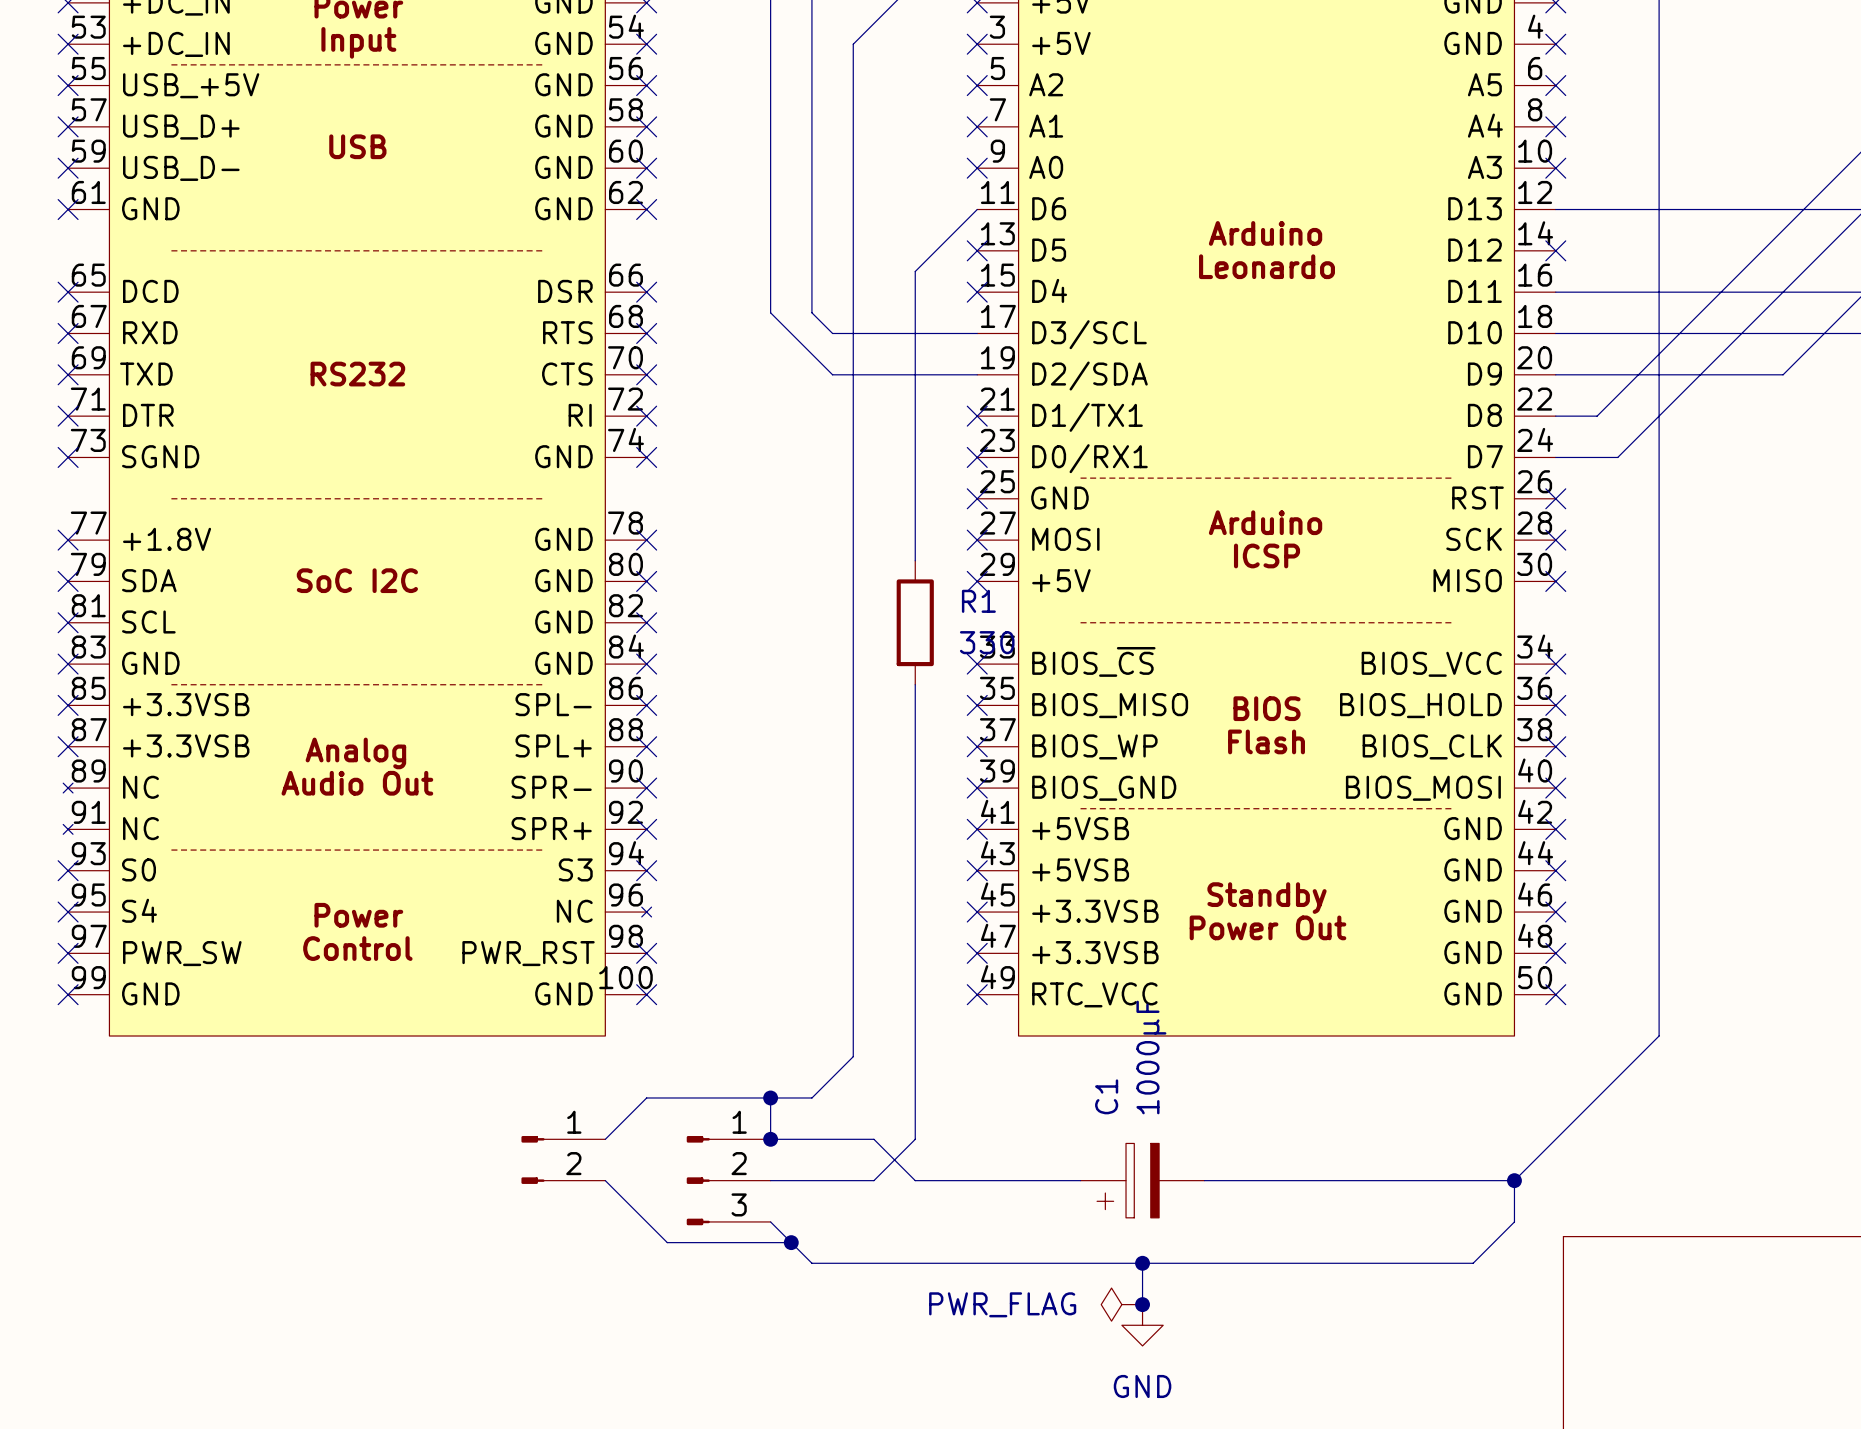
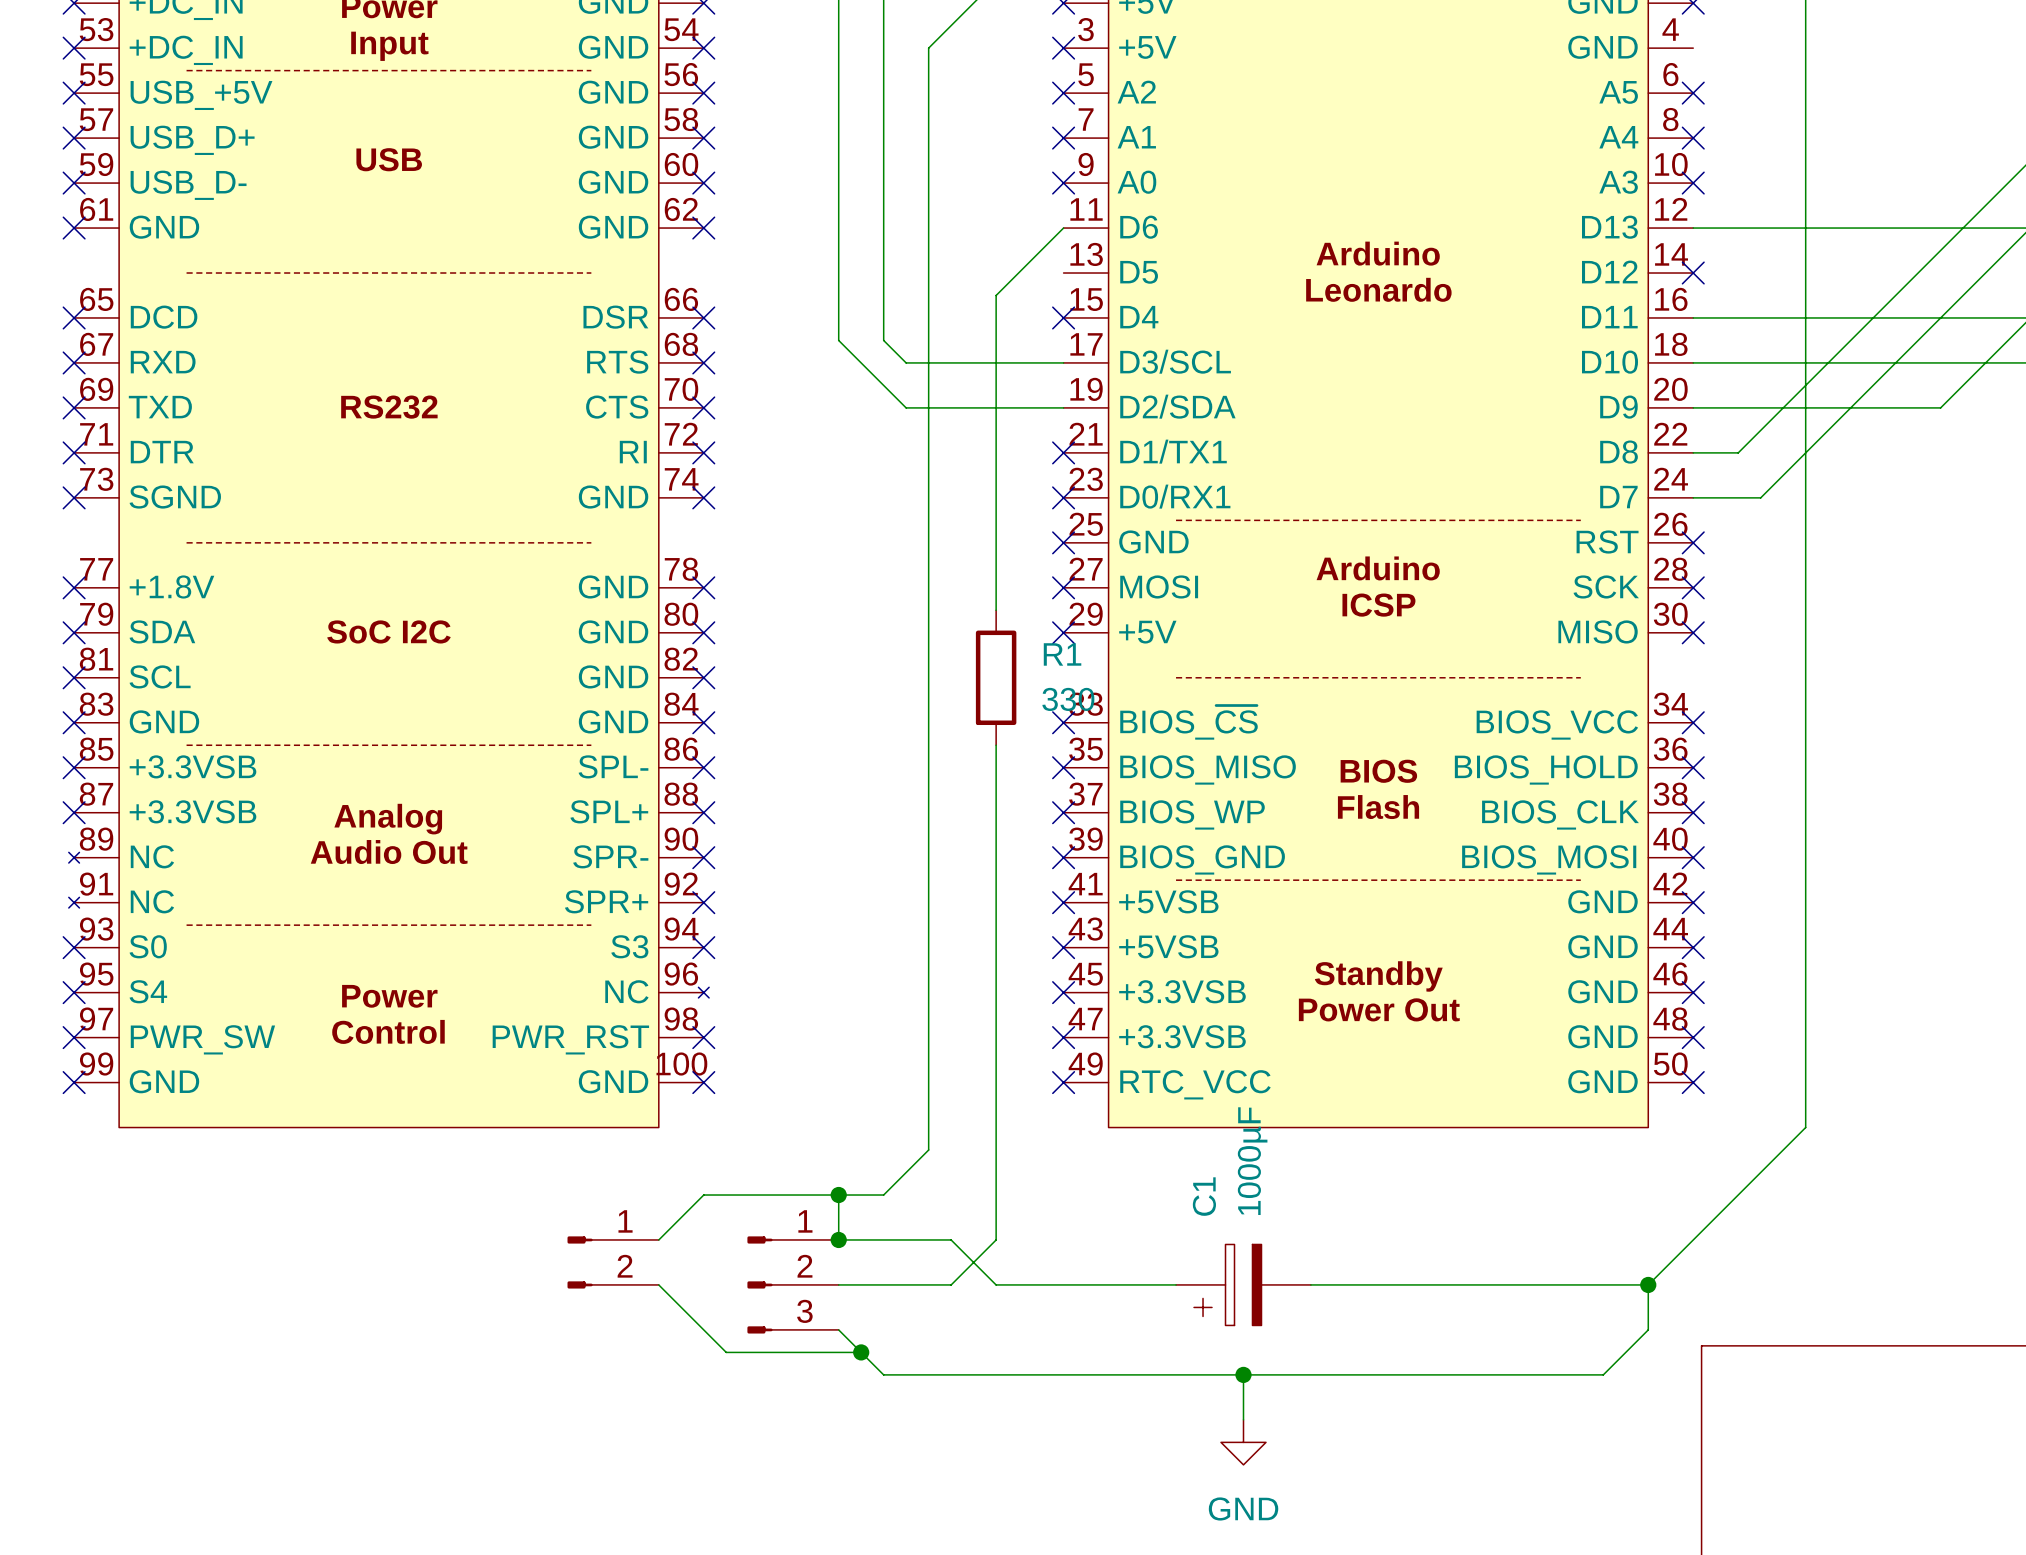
no-connect mark: (1555, 44) -> none
no-connect mark: (977, 250) -> none
power symbol: PWR_FLAG (1121, 1304) -> none
junction: (1142, 1304) -> none

